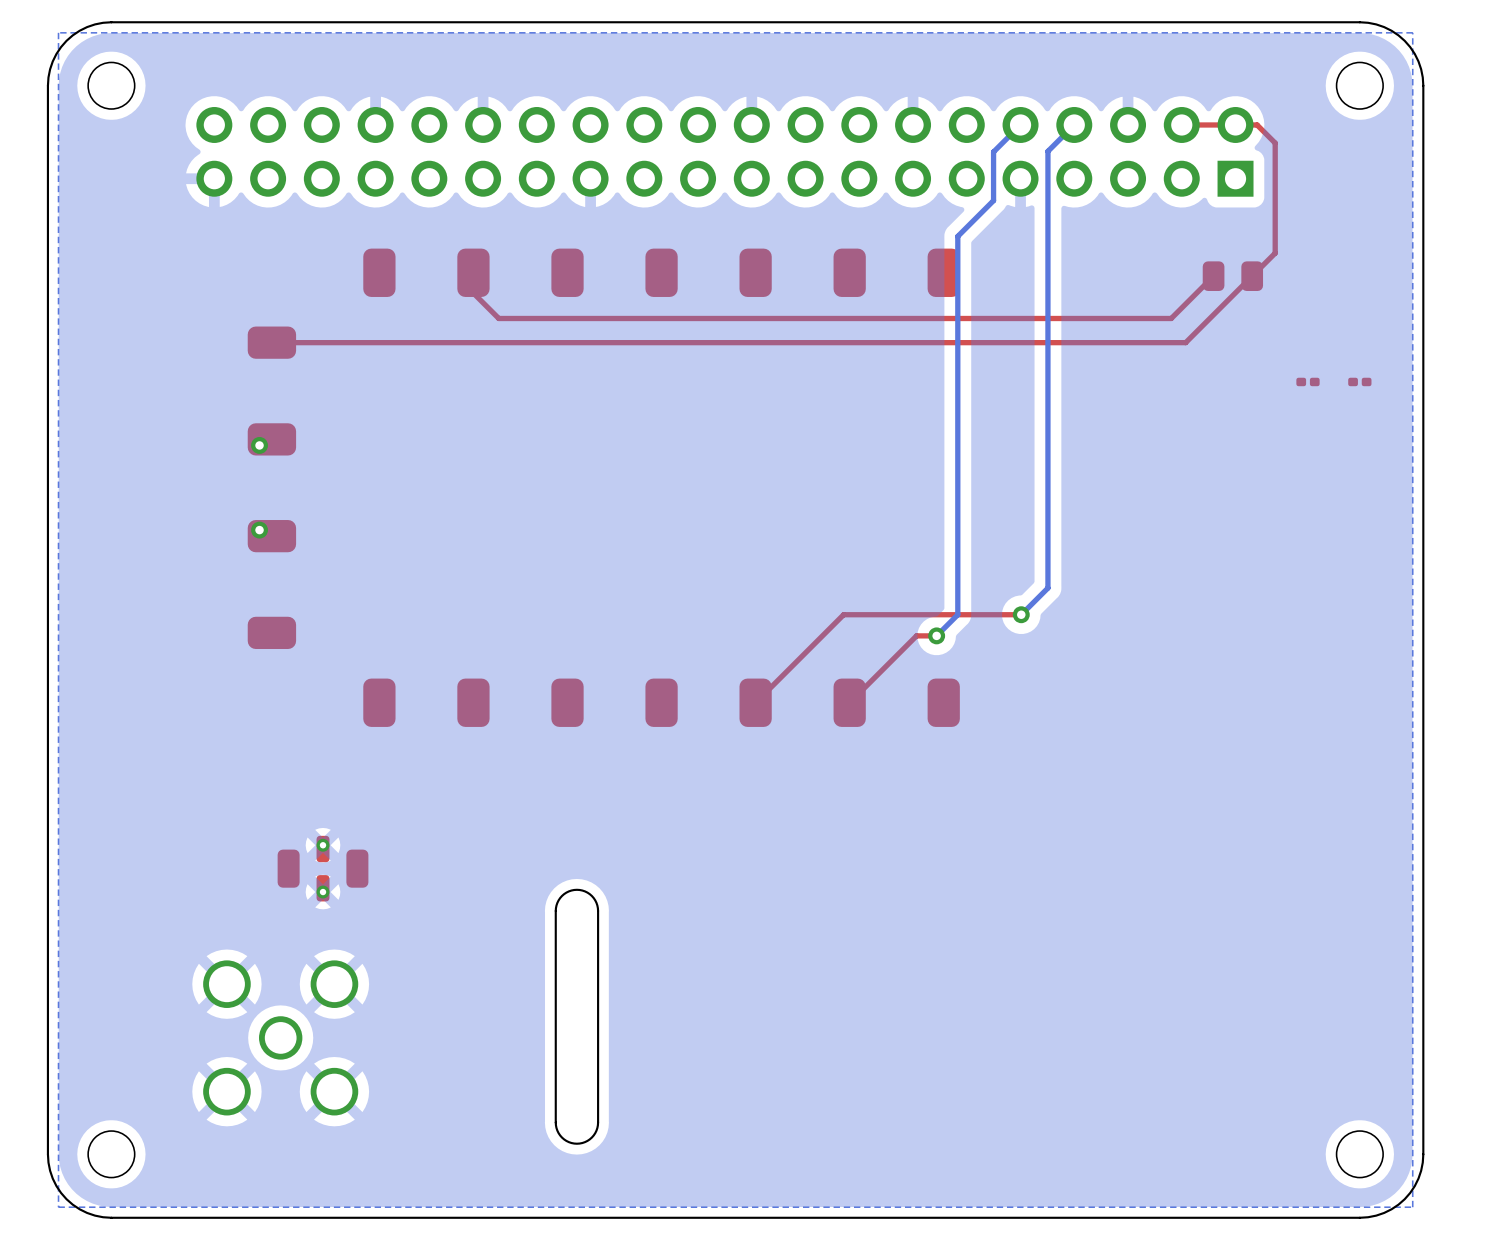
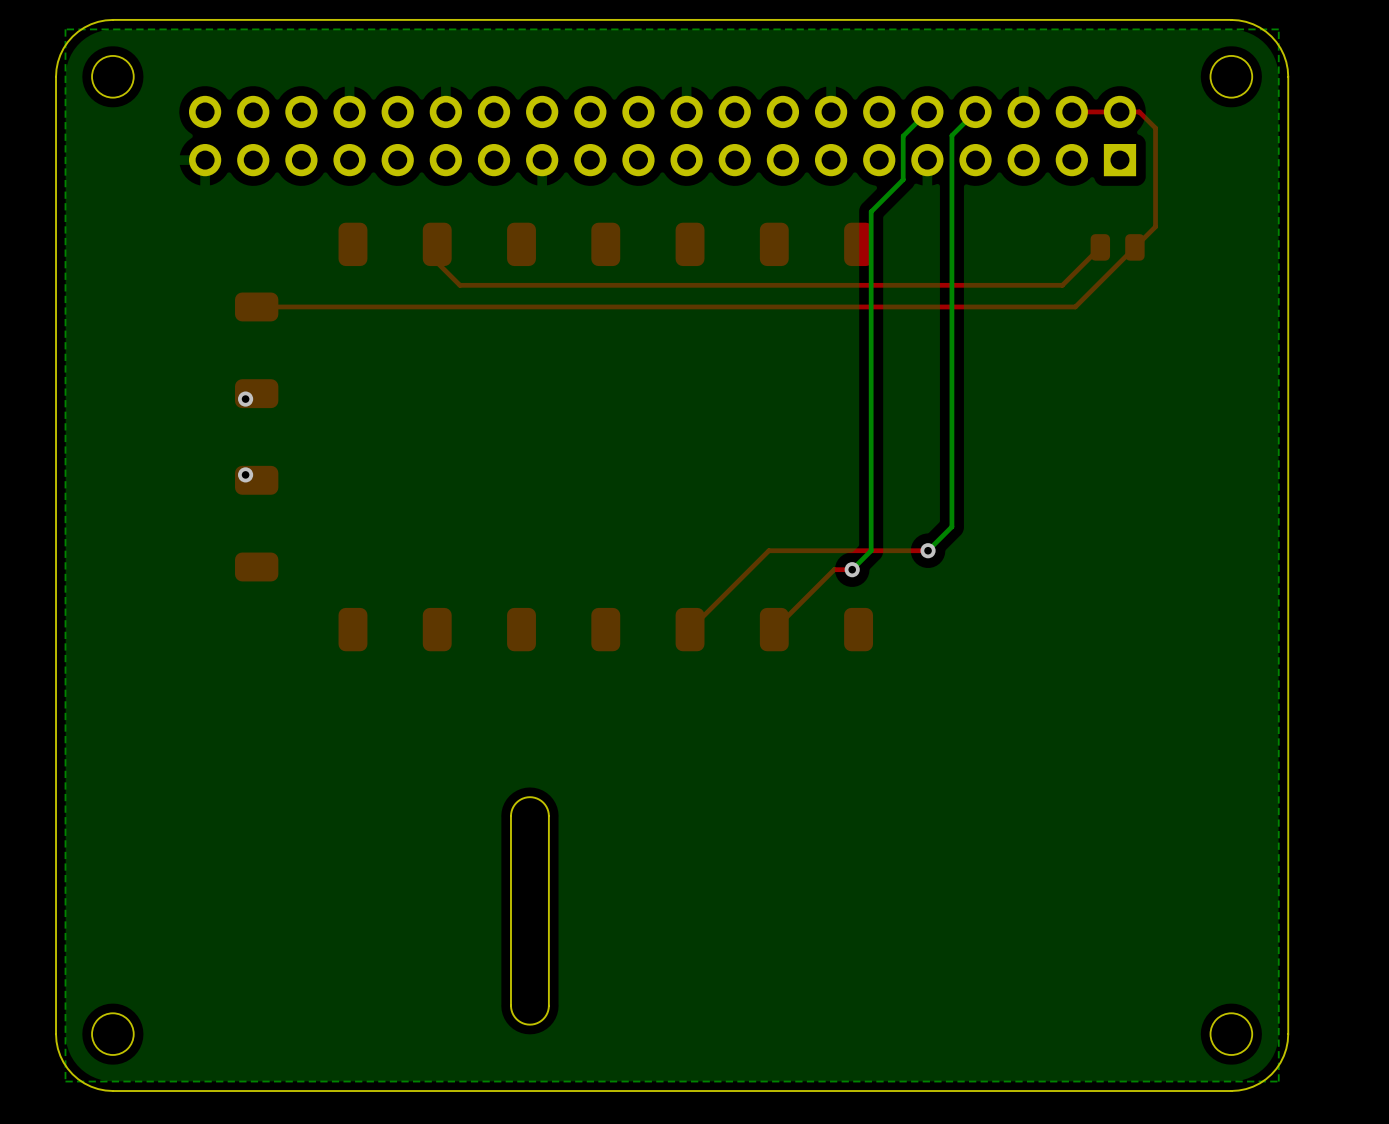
part: (1308, 381) -> none
part: (1359, 381) -> none
part: (323, 868) -> none
part: (280, 1037) -> none

